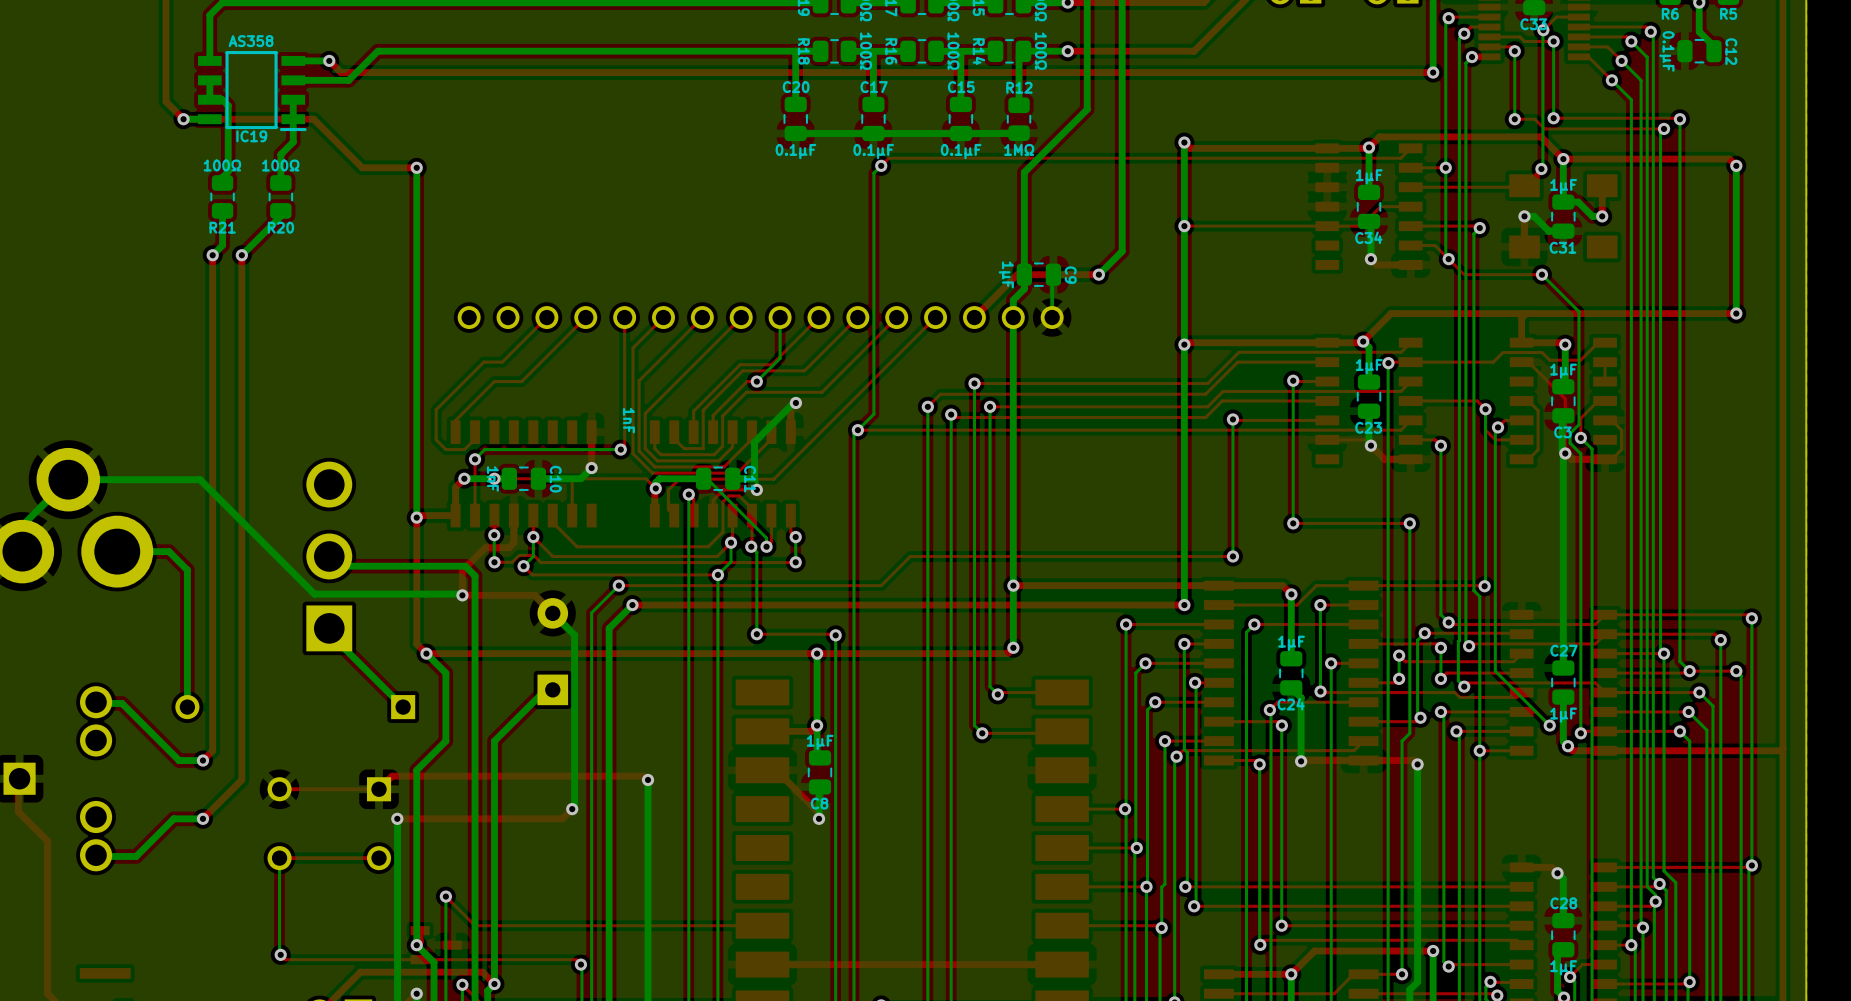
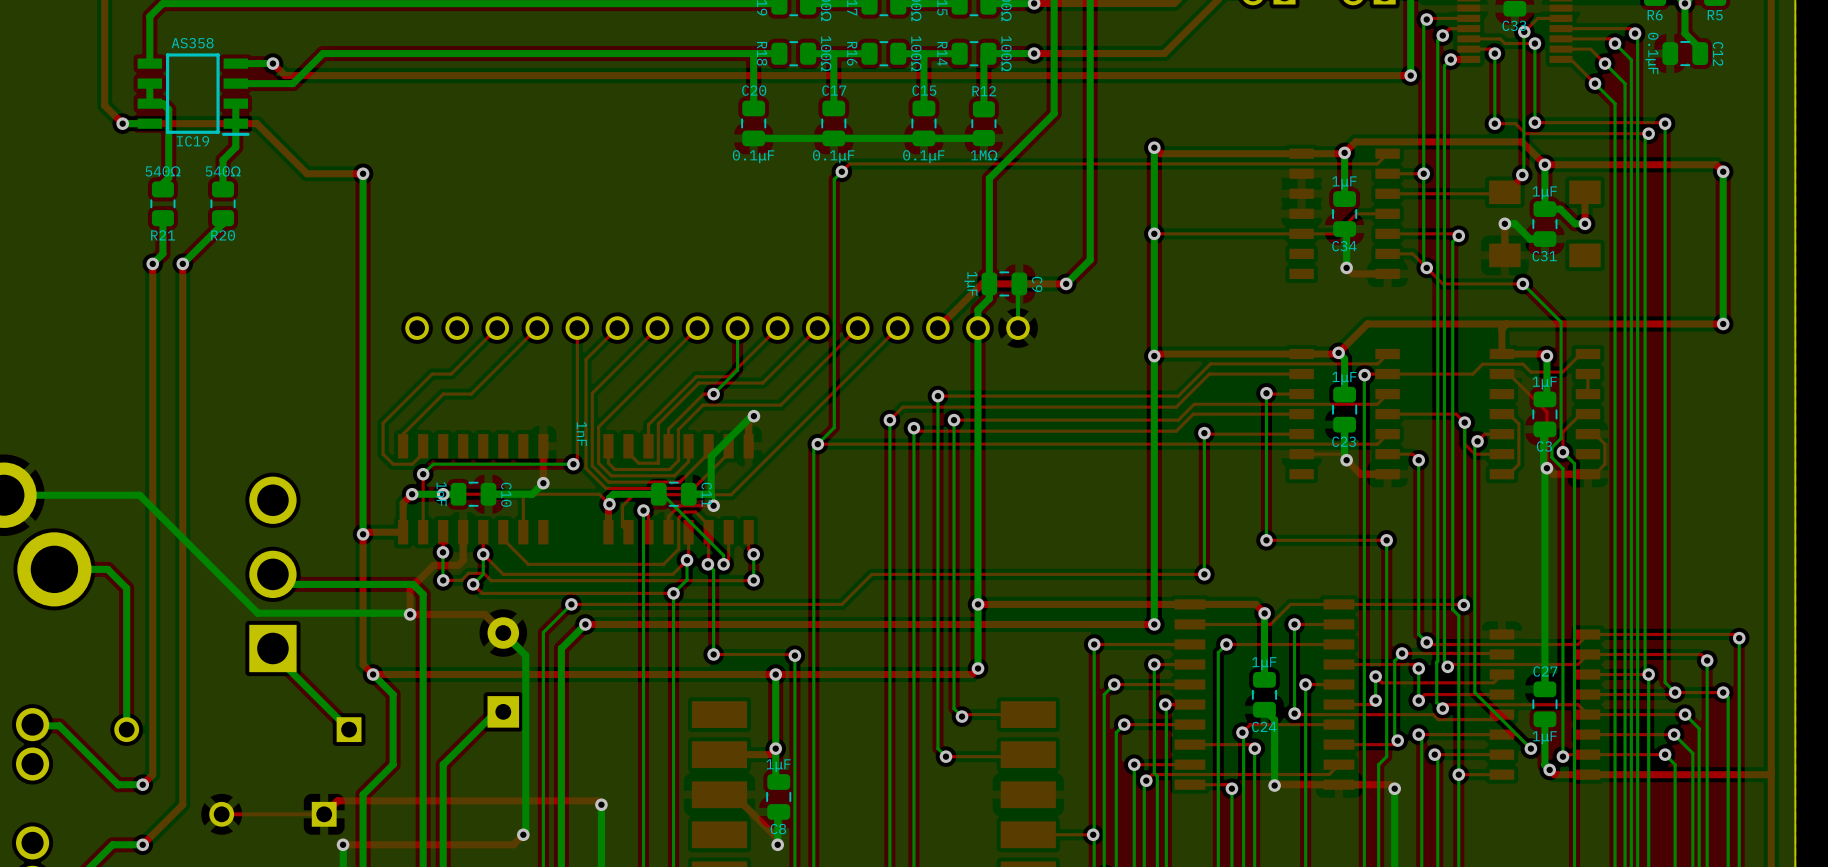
R21 text: 100Ω (222, 165) -> 540Ω (163, 171)
R20 text: 100Ω (280, 165) -> 540Ω (223, 171)

